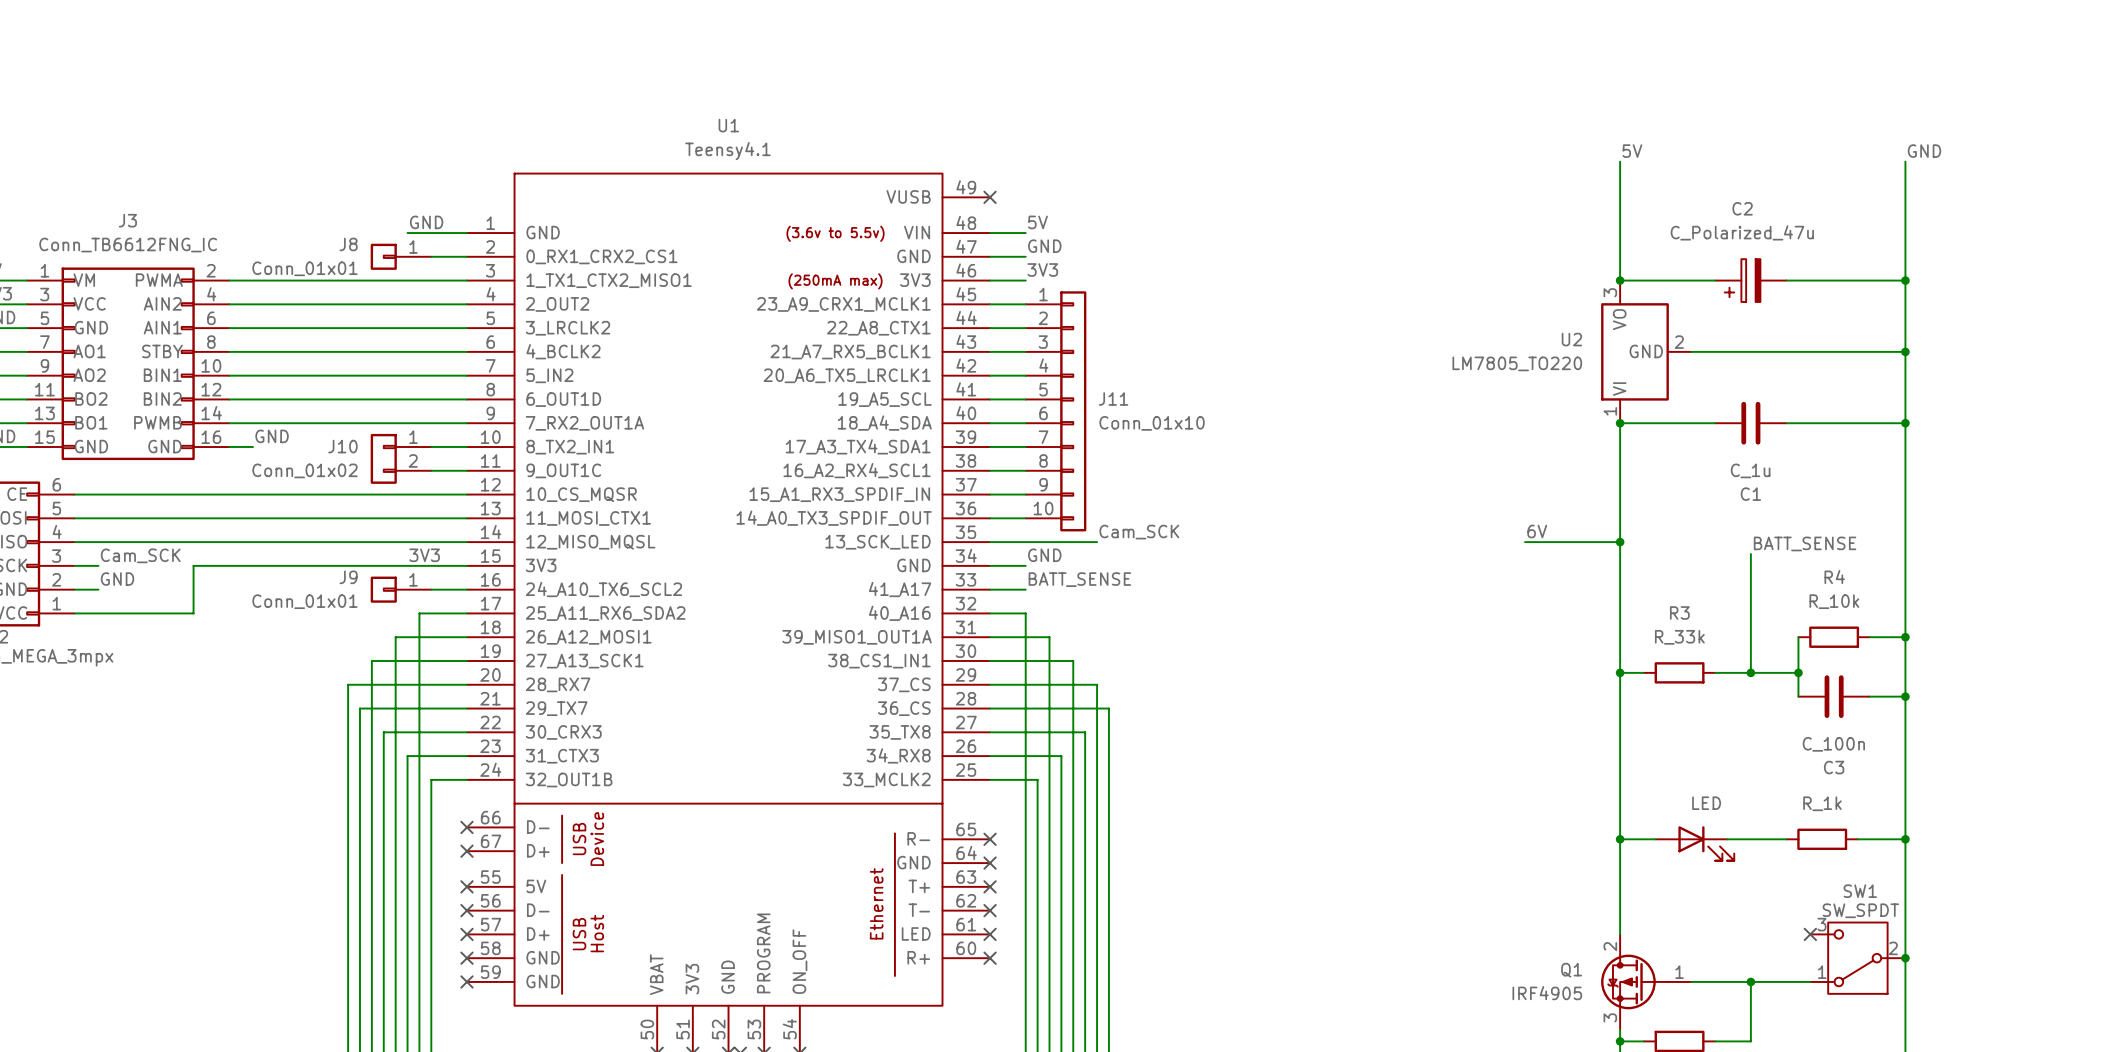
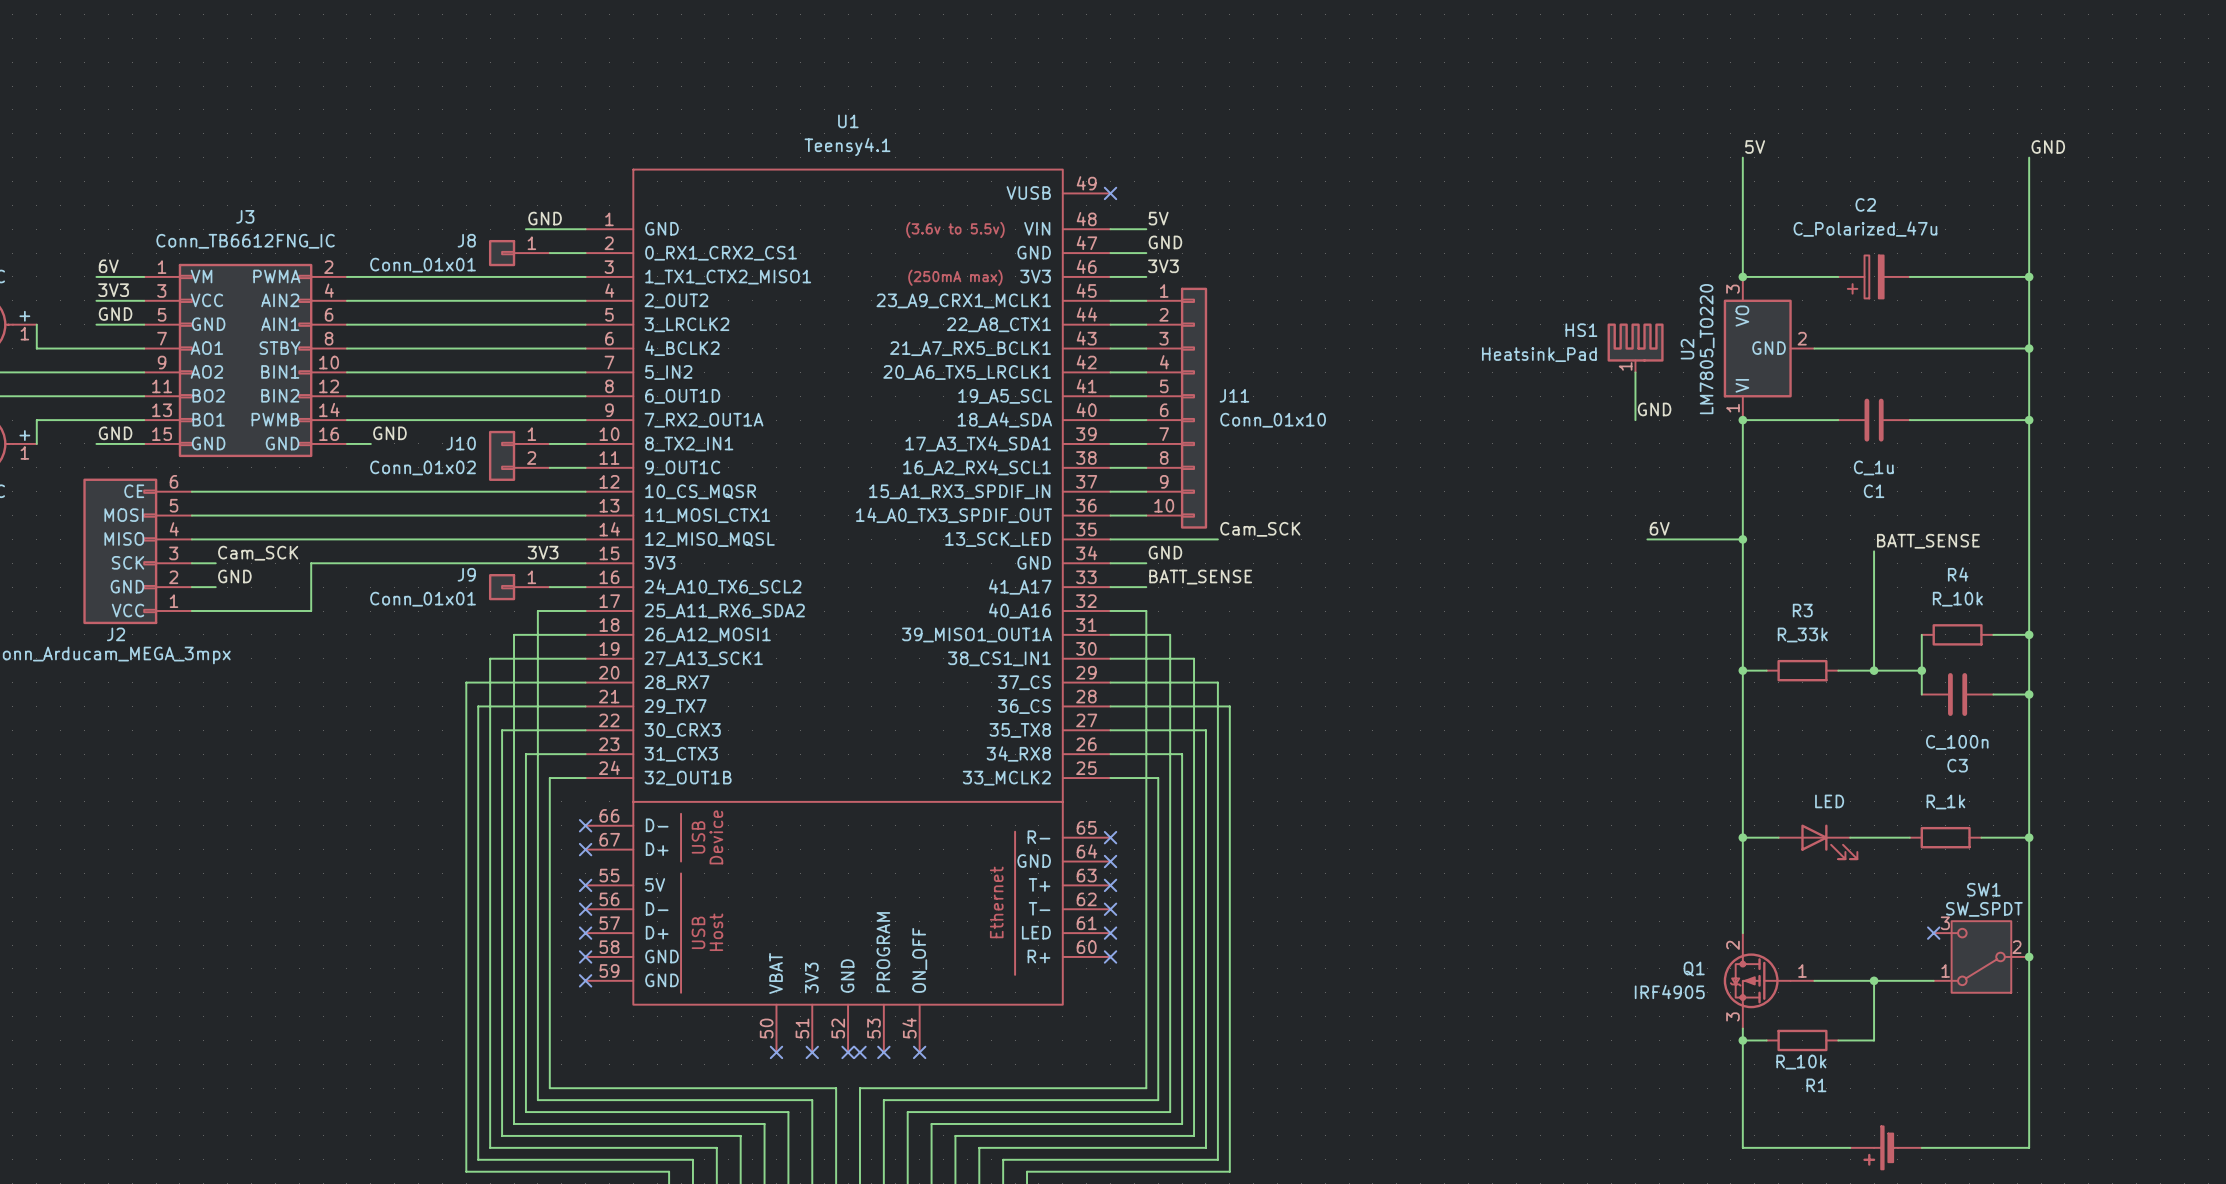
U2 name rotation: 0° (1571, 339) -> 90° counterclockwise (1687, 349)
HS1: none -> Heatsink_Pad (1635, 347)
U2 value rotation: 0° (1517, 363) -> 90° counterclockwise (1707, 349)
wire: none -> (1635, 372) (1635, 420)
label: none -> GND (1654, 409)

